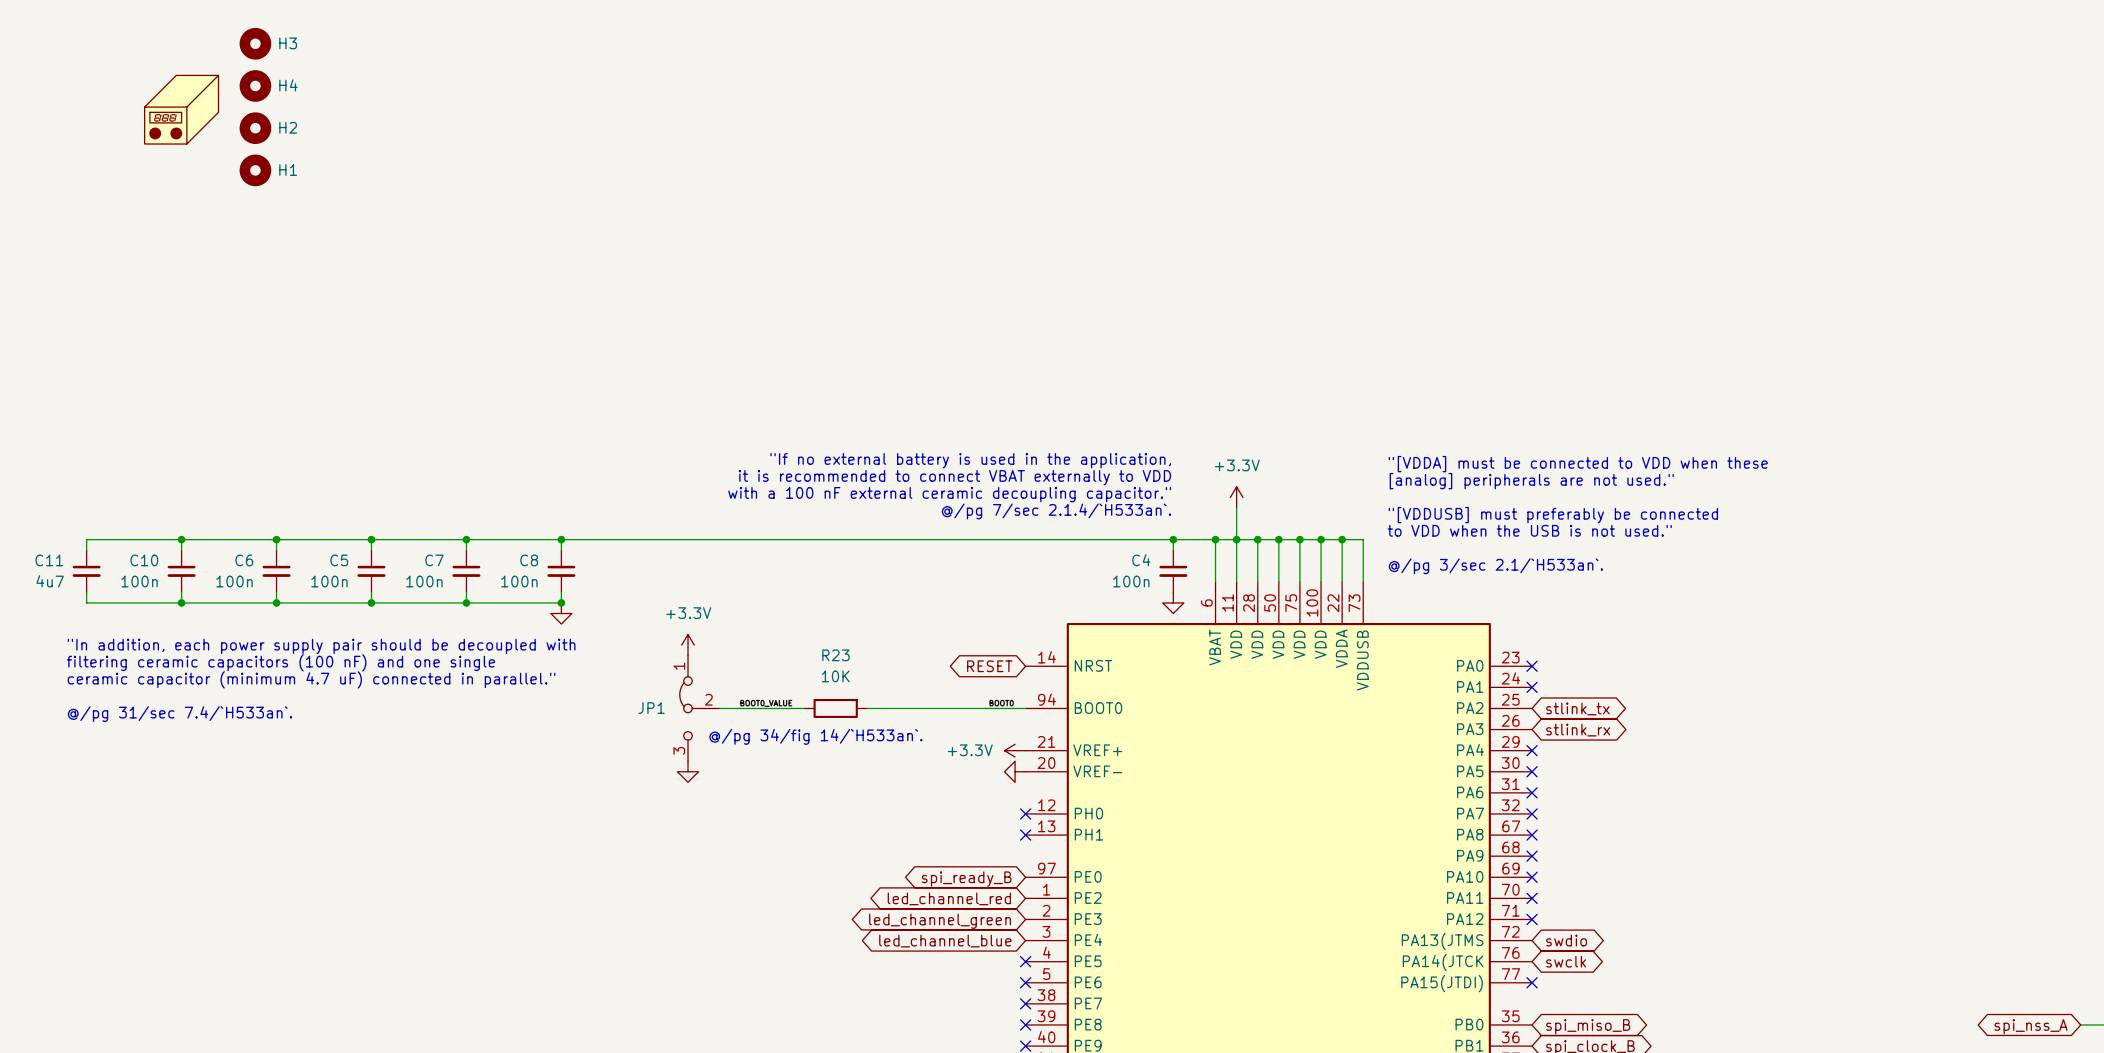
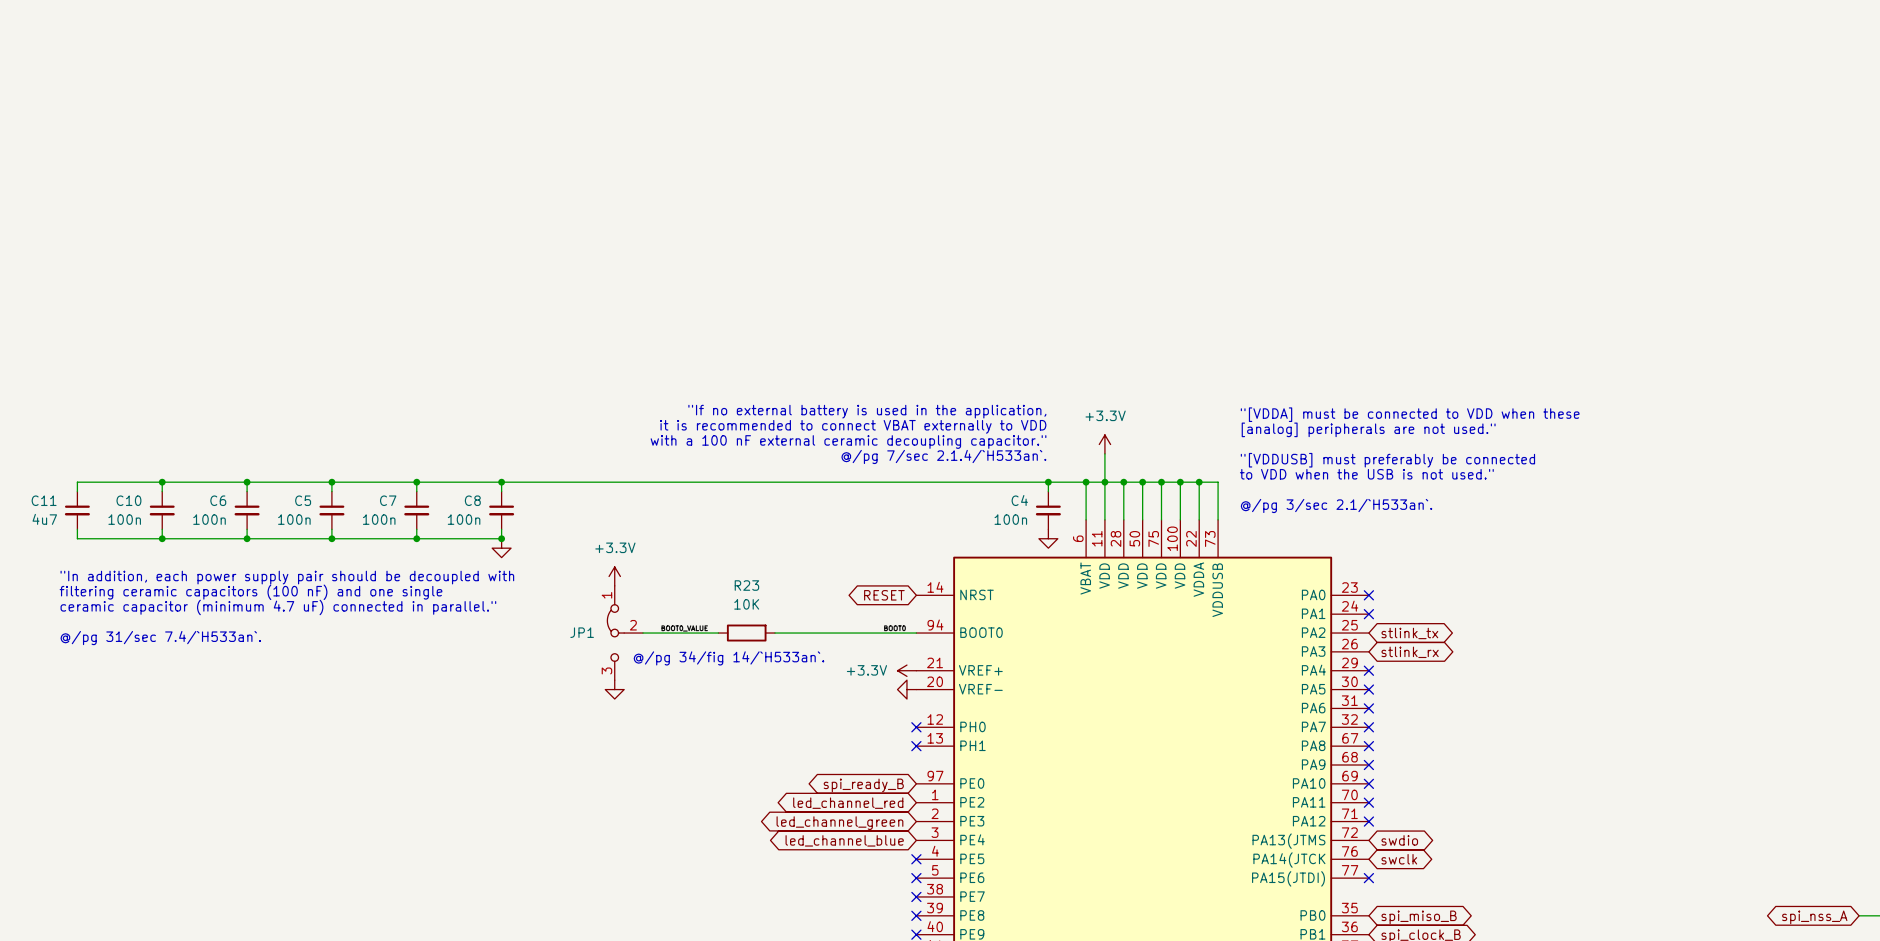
H3: (255, 43) -> none
H4: (255, 85) -> none
part: (181, 109) -> none
H2: (255, 128) -> none
H1: (255, 170) -> none

